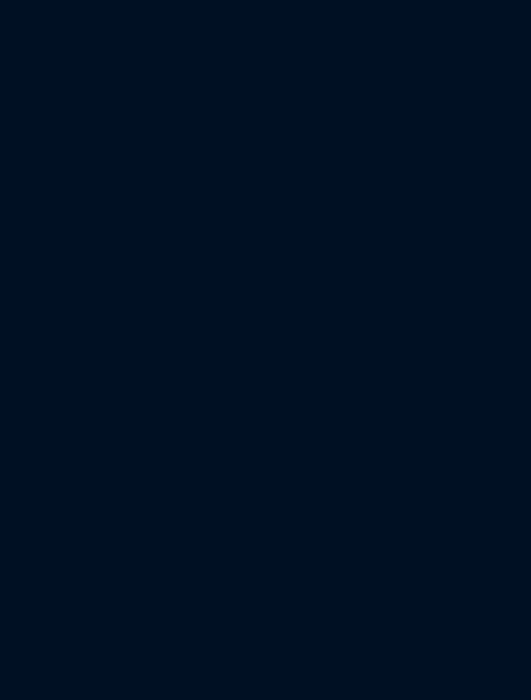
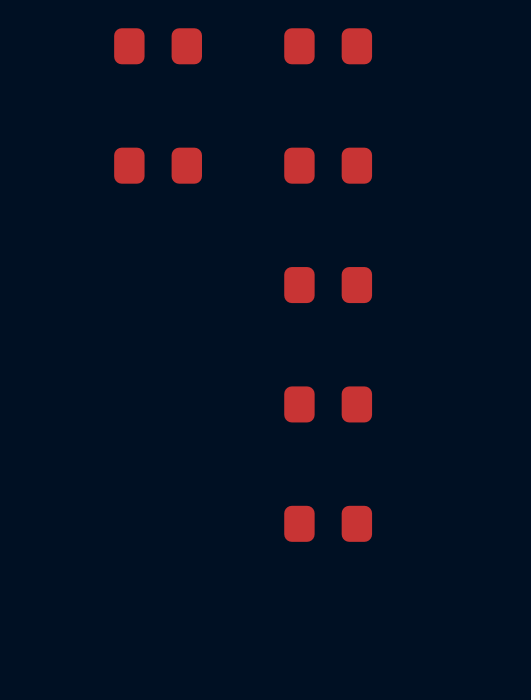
part: none -> (158, 46)
part: none -> (328, 46)
part: none -> (158, 165)
part: none -> (328, 165)
part: none -> (328, 285)
part: none -> (328, 404)
part: none -> (328, 523)

